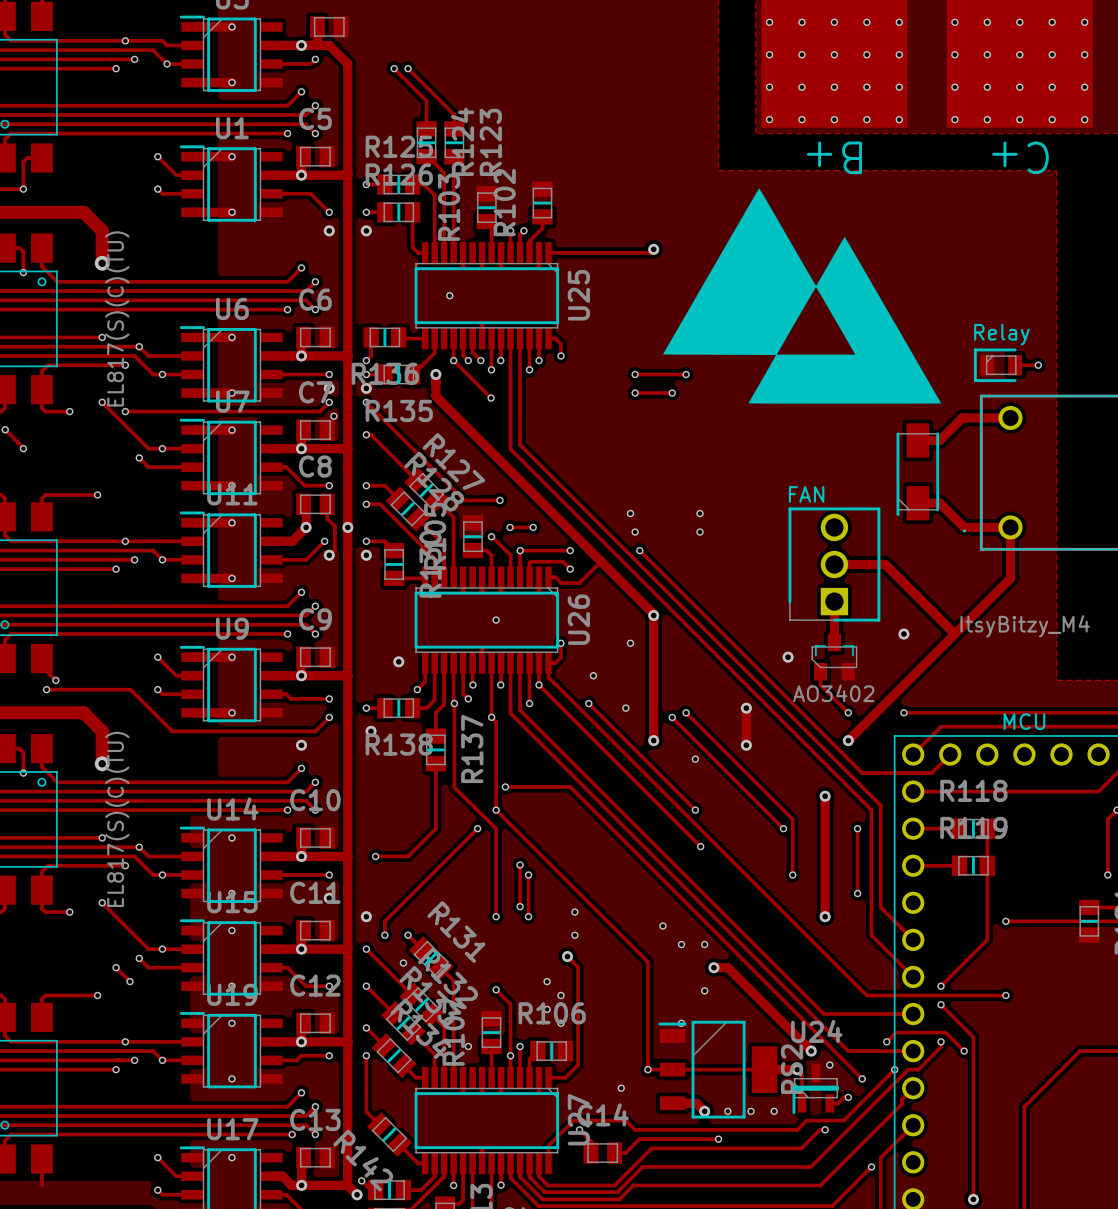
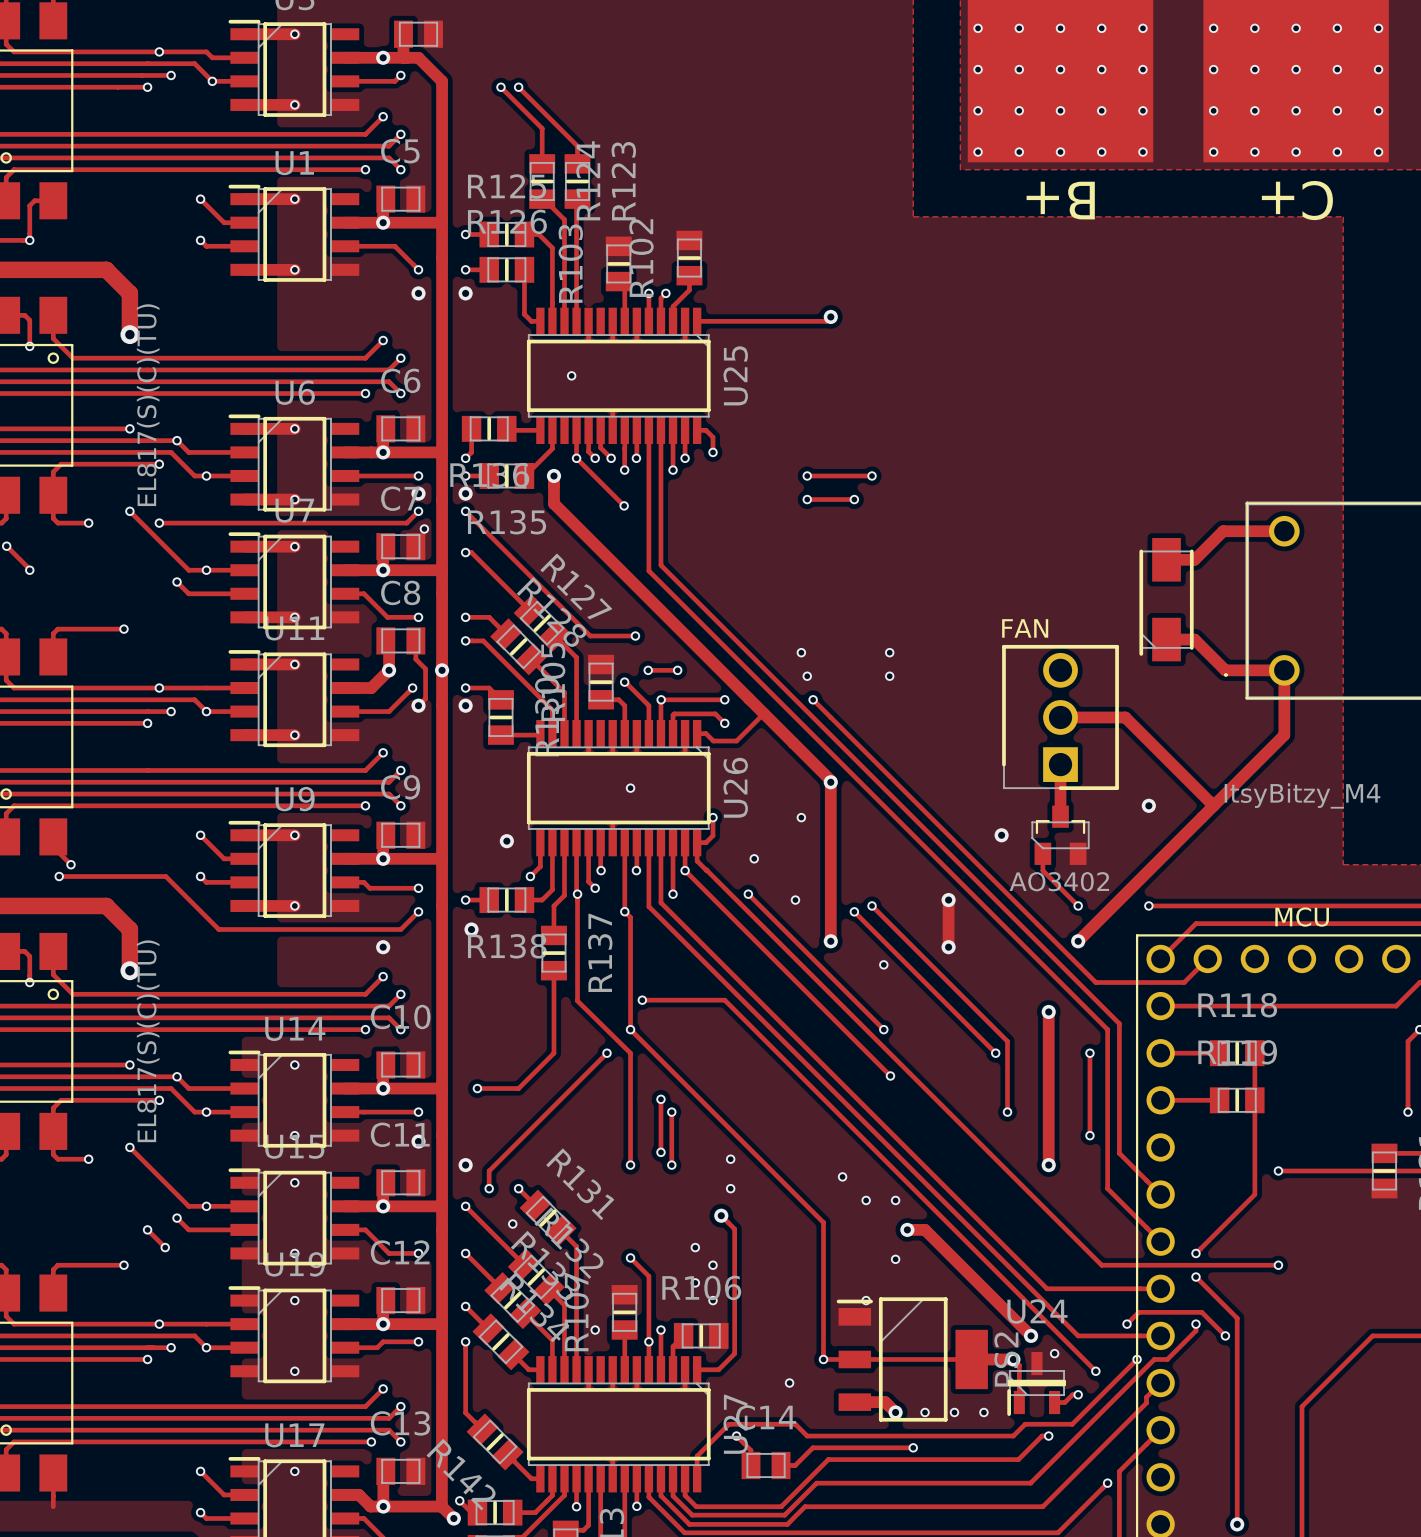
drawing: [662, 188, 942, 404] -> none
text: Relay (1001, 334) -> none
part: (997, 365) -> none
track: (1015, 365) (1038, 365) -> none
via: (1038, 365) -> none

